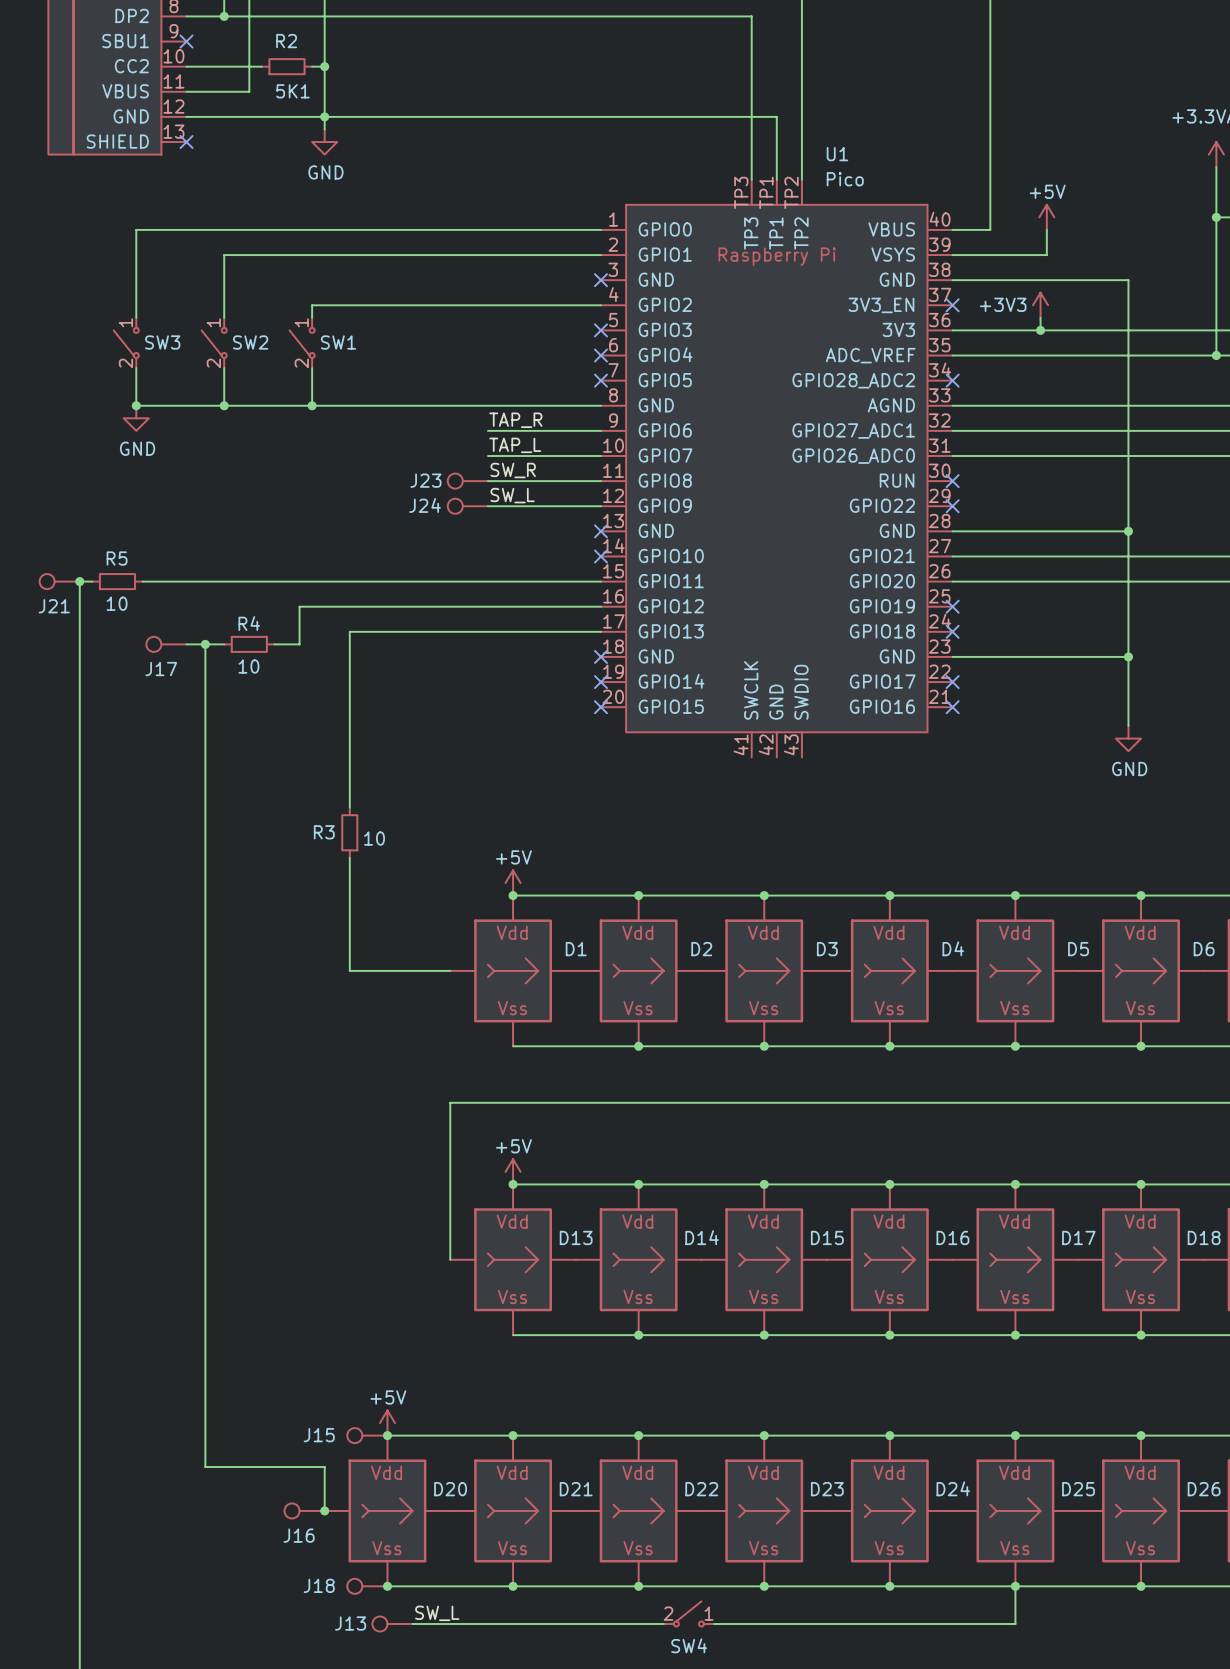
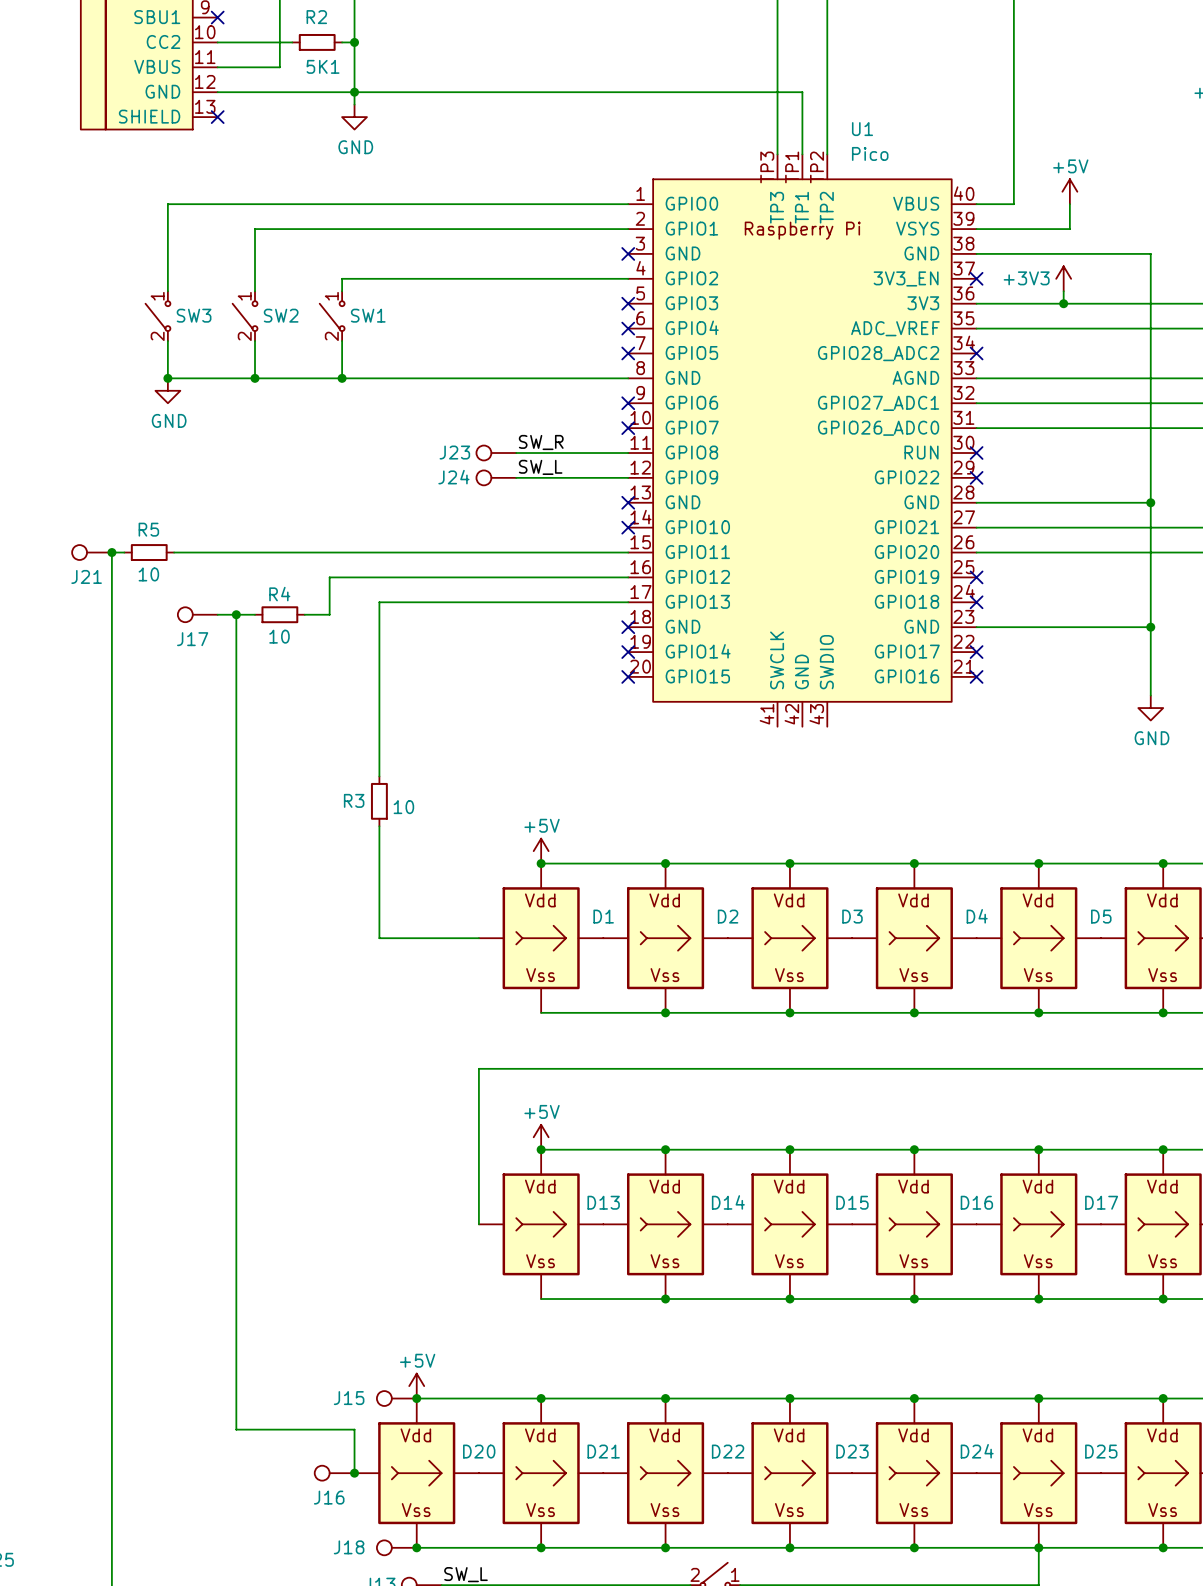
label: TAP_R (515, 420) -> none
wire: (487, 430) (600, 430) -> none
no-connect mark: none -> (628, 403)
label: TAP_L (515, 445) -> none
wire: (487, 455) (600, 455) -> none
no-connect mark: none -> (628, 428)

